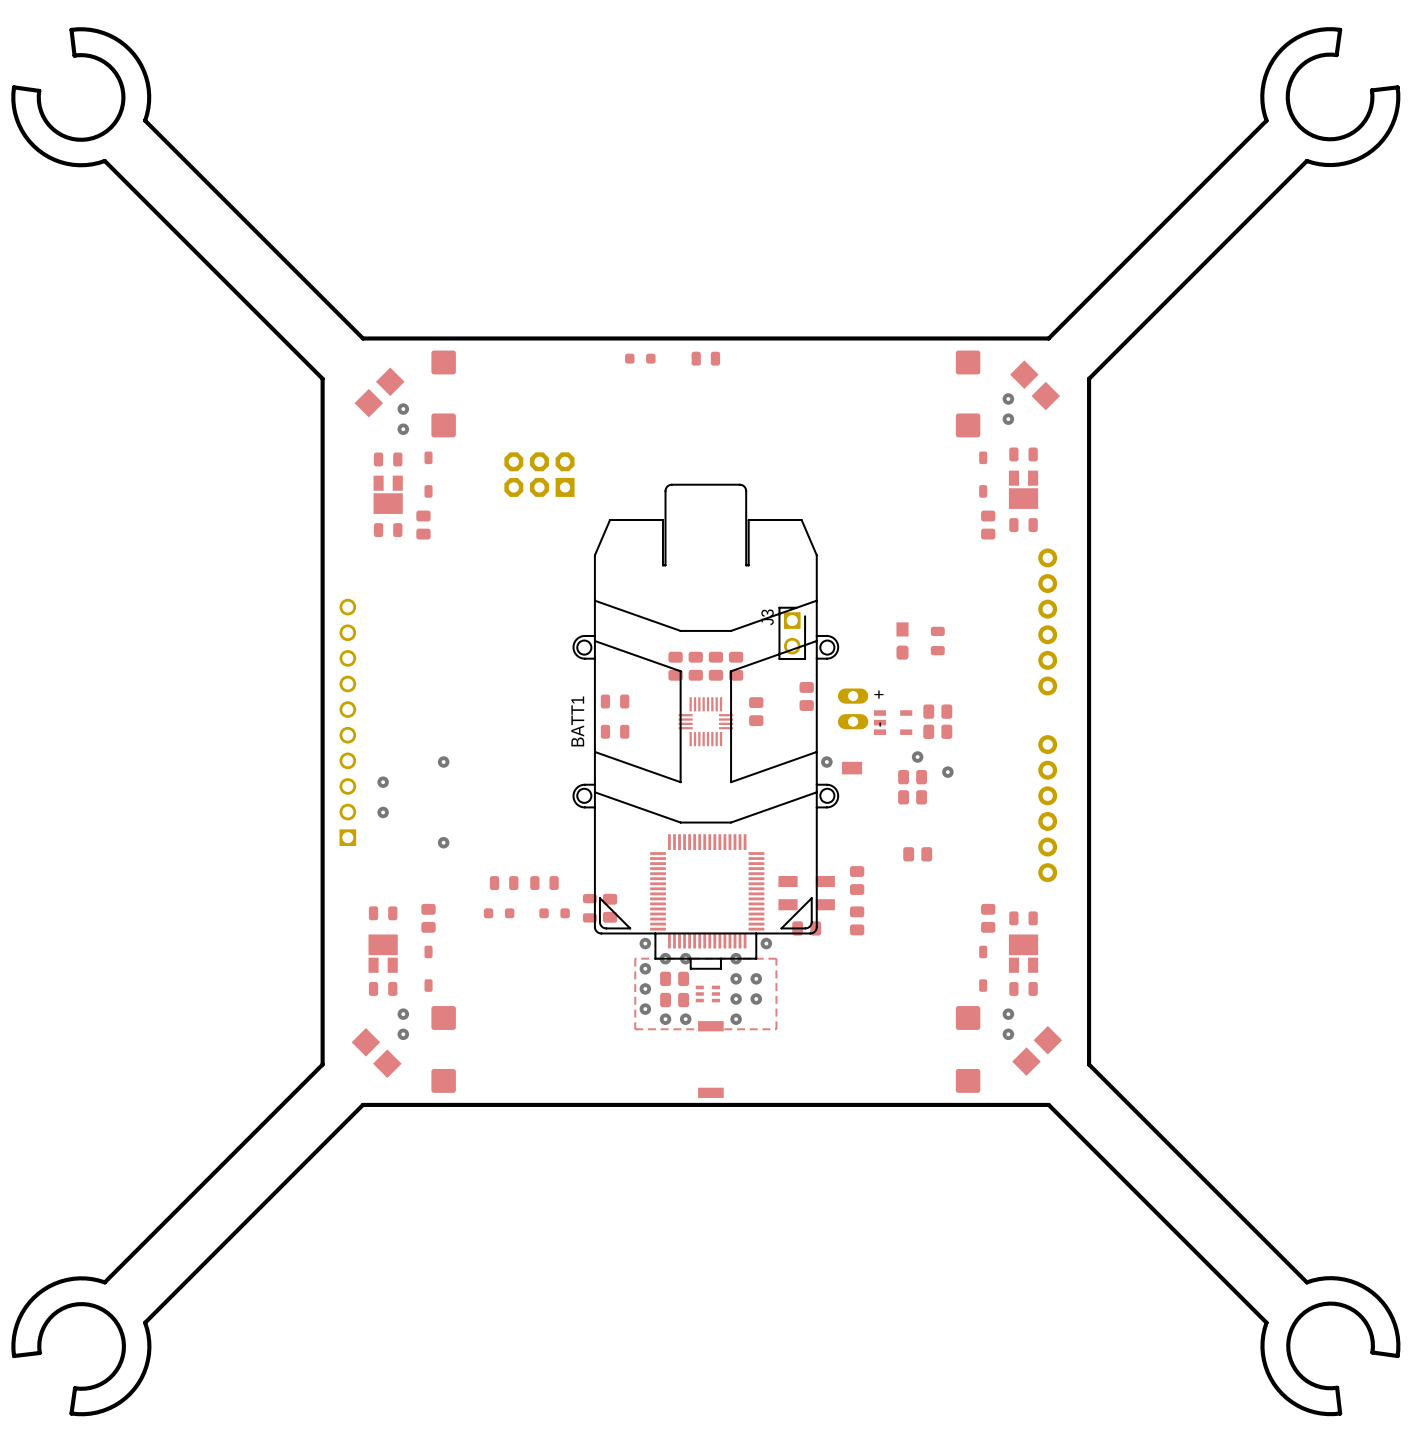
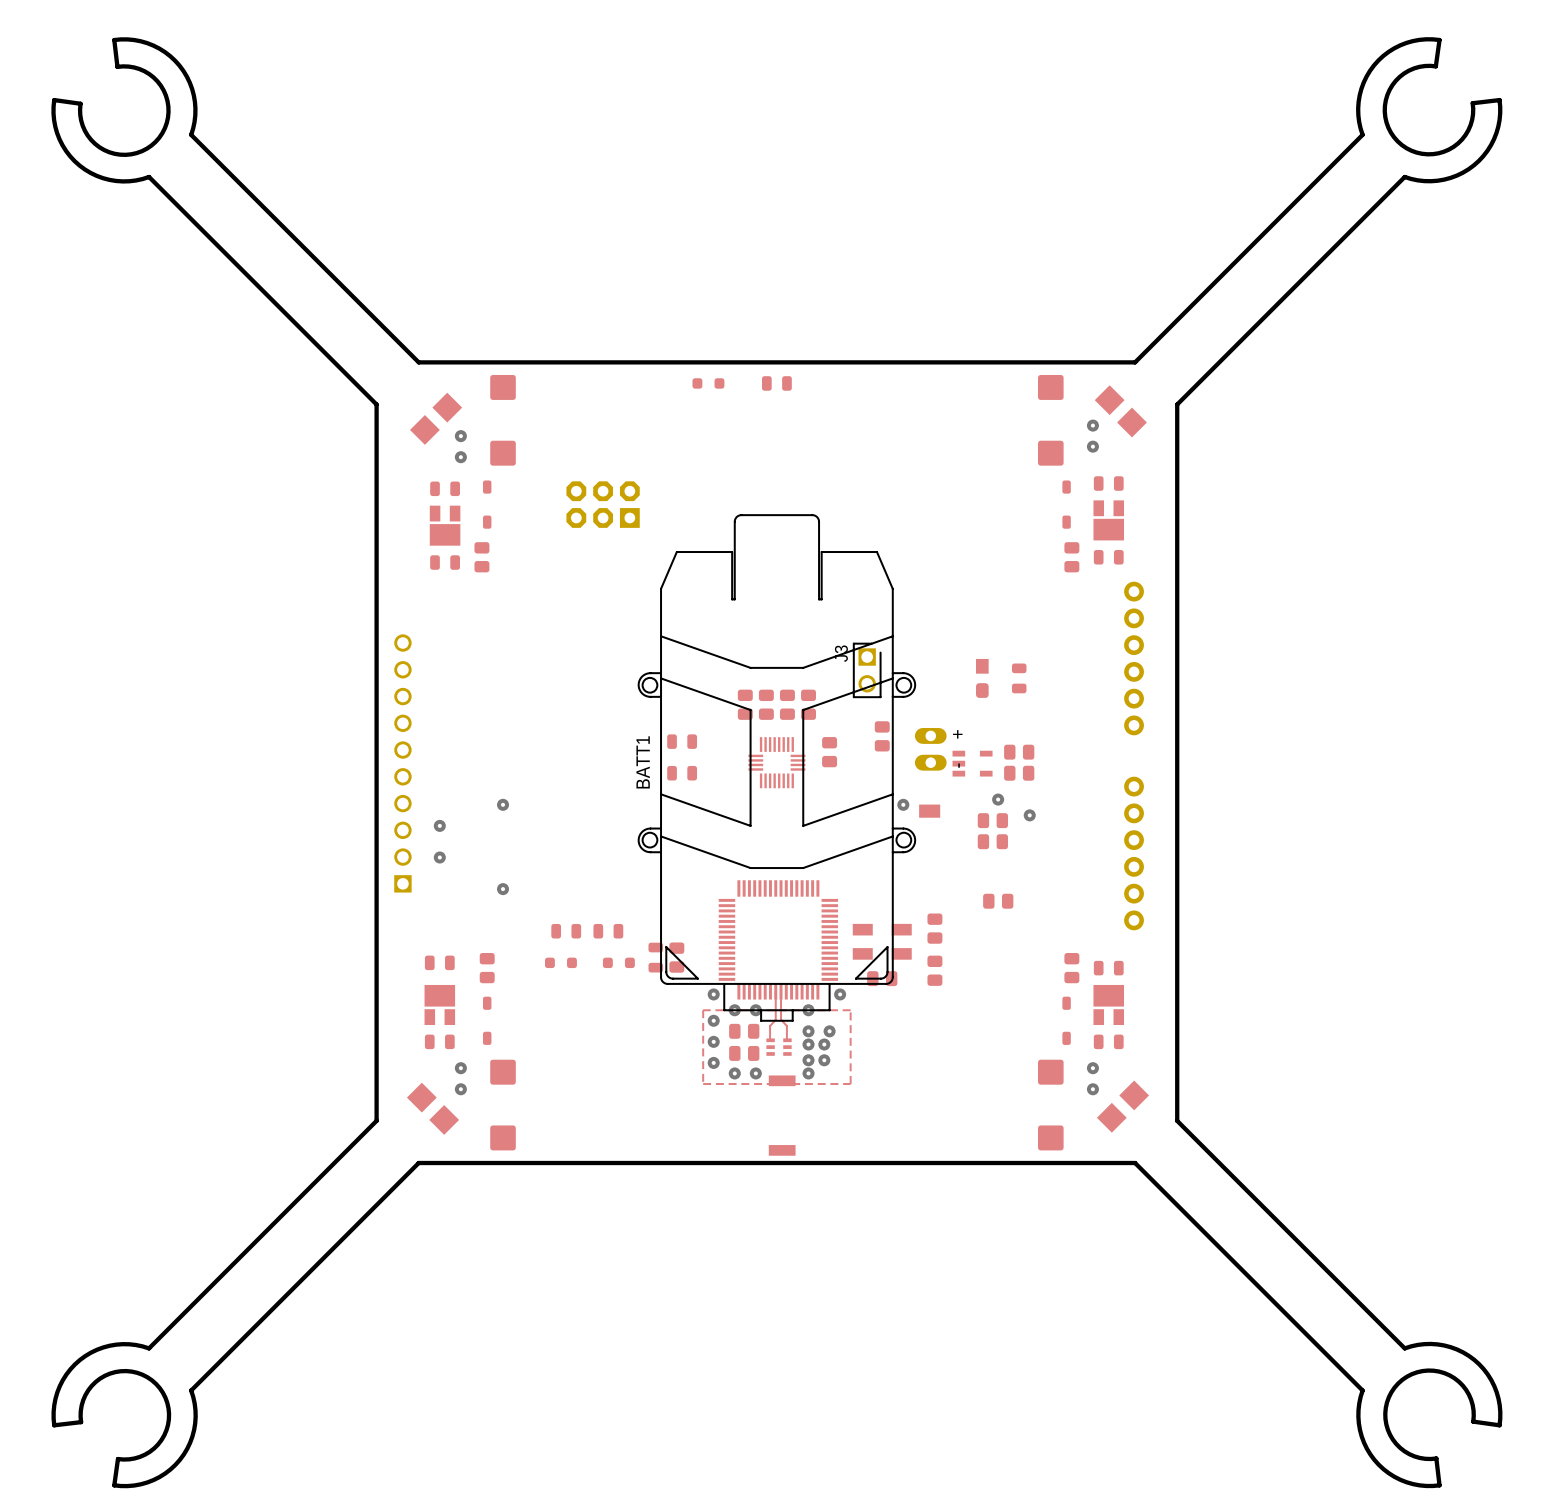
top track: none -> (775, 991) (775, 1019) (770, 1026) (770, 1040)
top track: none -> (781, 991) (781, 1019) (786, 1026) (786, 1040)
via: none -> (808, 1044)
via: none -> (824, 1044)
via: (736, 999) -> none
via: (756, 999) -> none
via: none -> (808, 1060)
via: none -> (824, 1060)

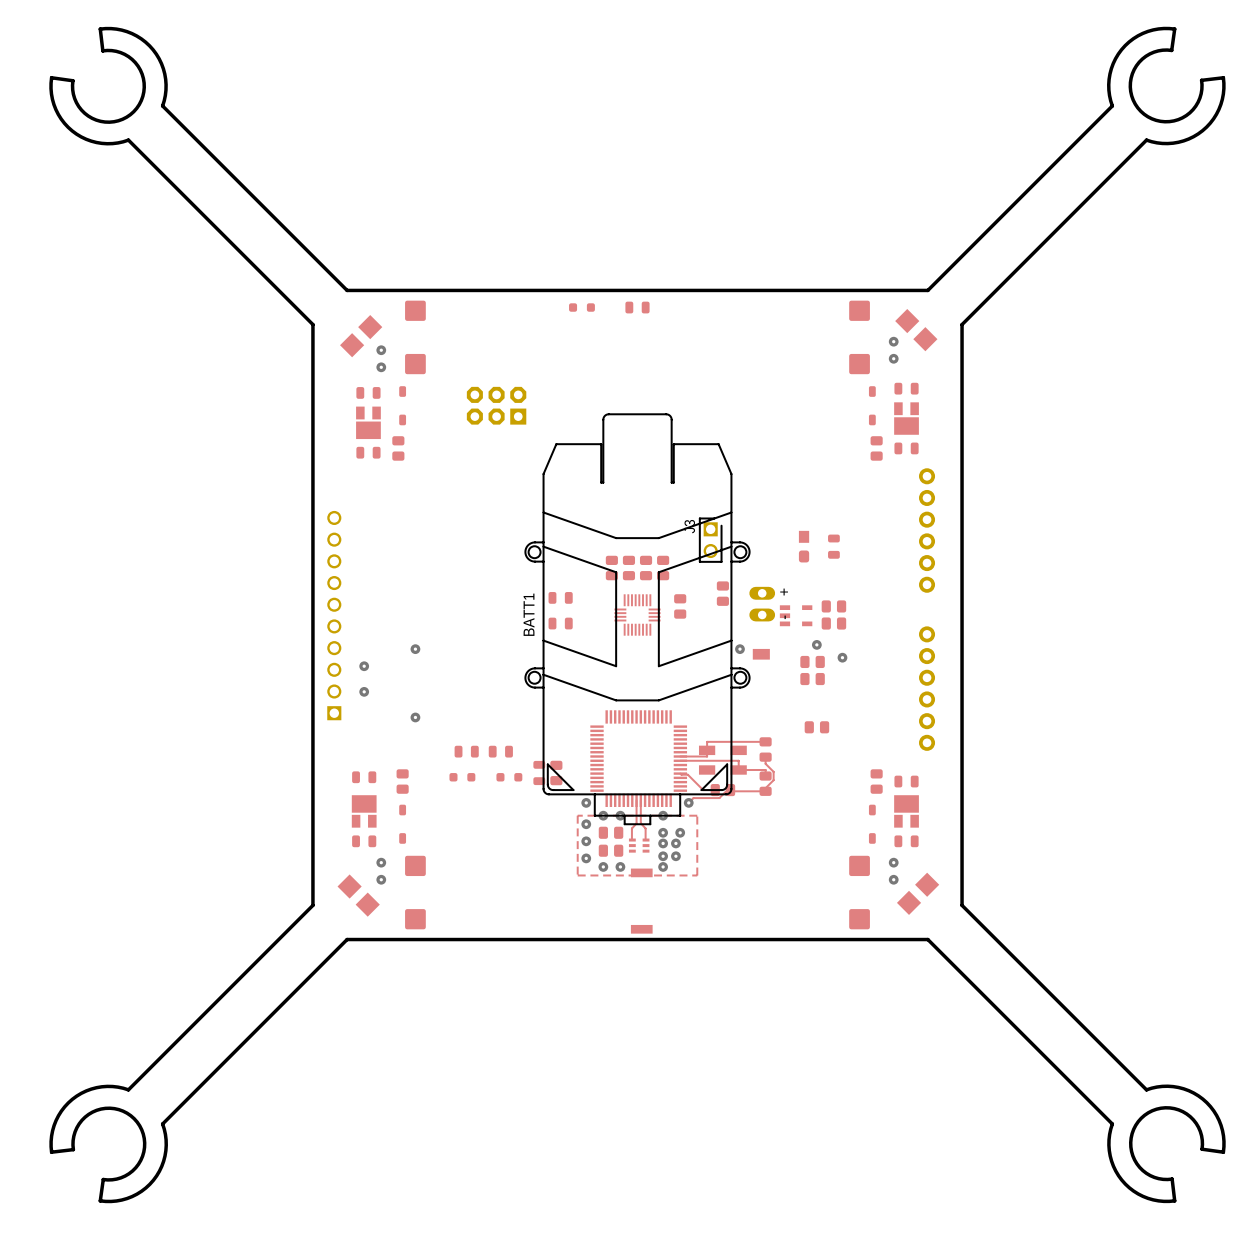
top track: none -> (765, 741) (707, 741) (707, 756) (680, 756)
top track: none -> (765, 757) (765, 763) (773, 771) (773, 780) (765, 788) (765, 791) (727, 790) (719, 798) (693, 798) (688, 802)
top track: none -> (680, 760) (738, 760) (738, 770) (765, 770) (765, 776)
top track: none -> (680, 773) (687, 774) (703, 790) (715, 790)

